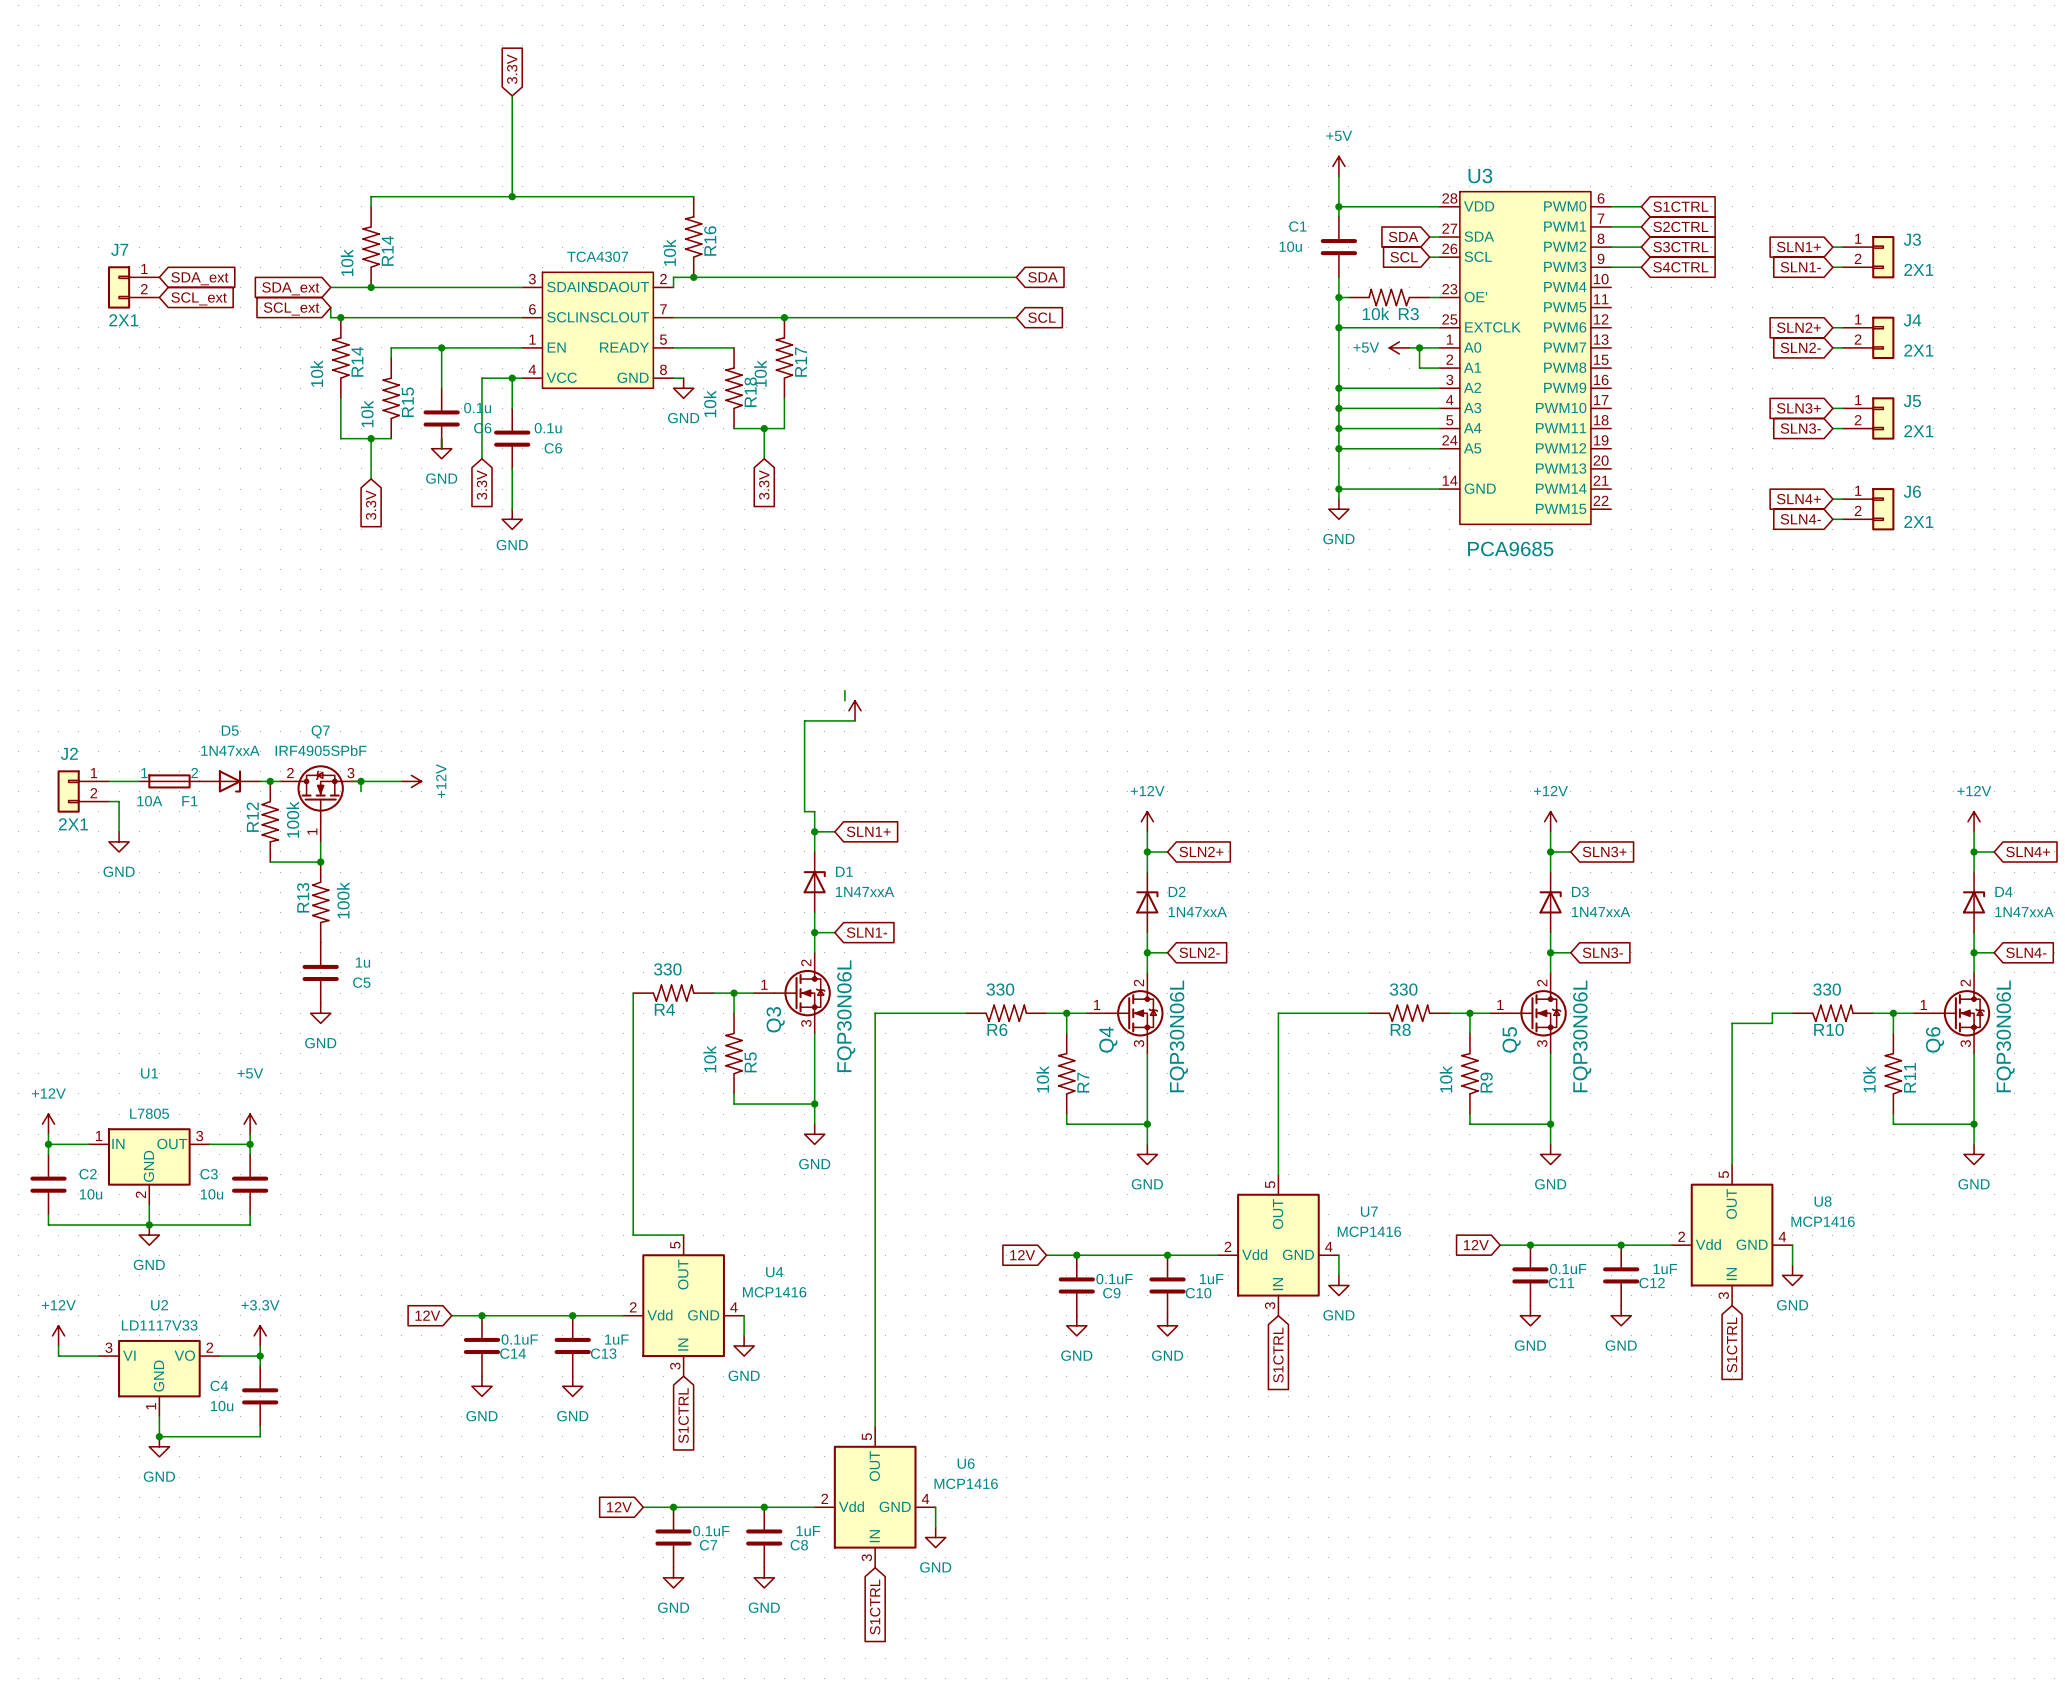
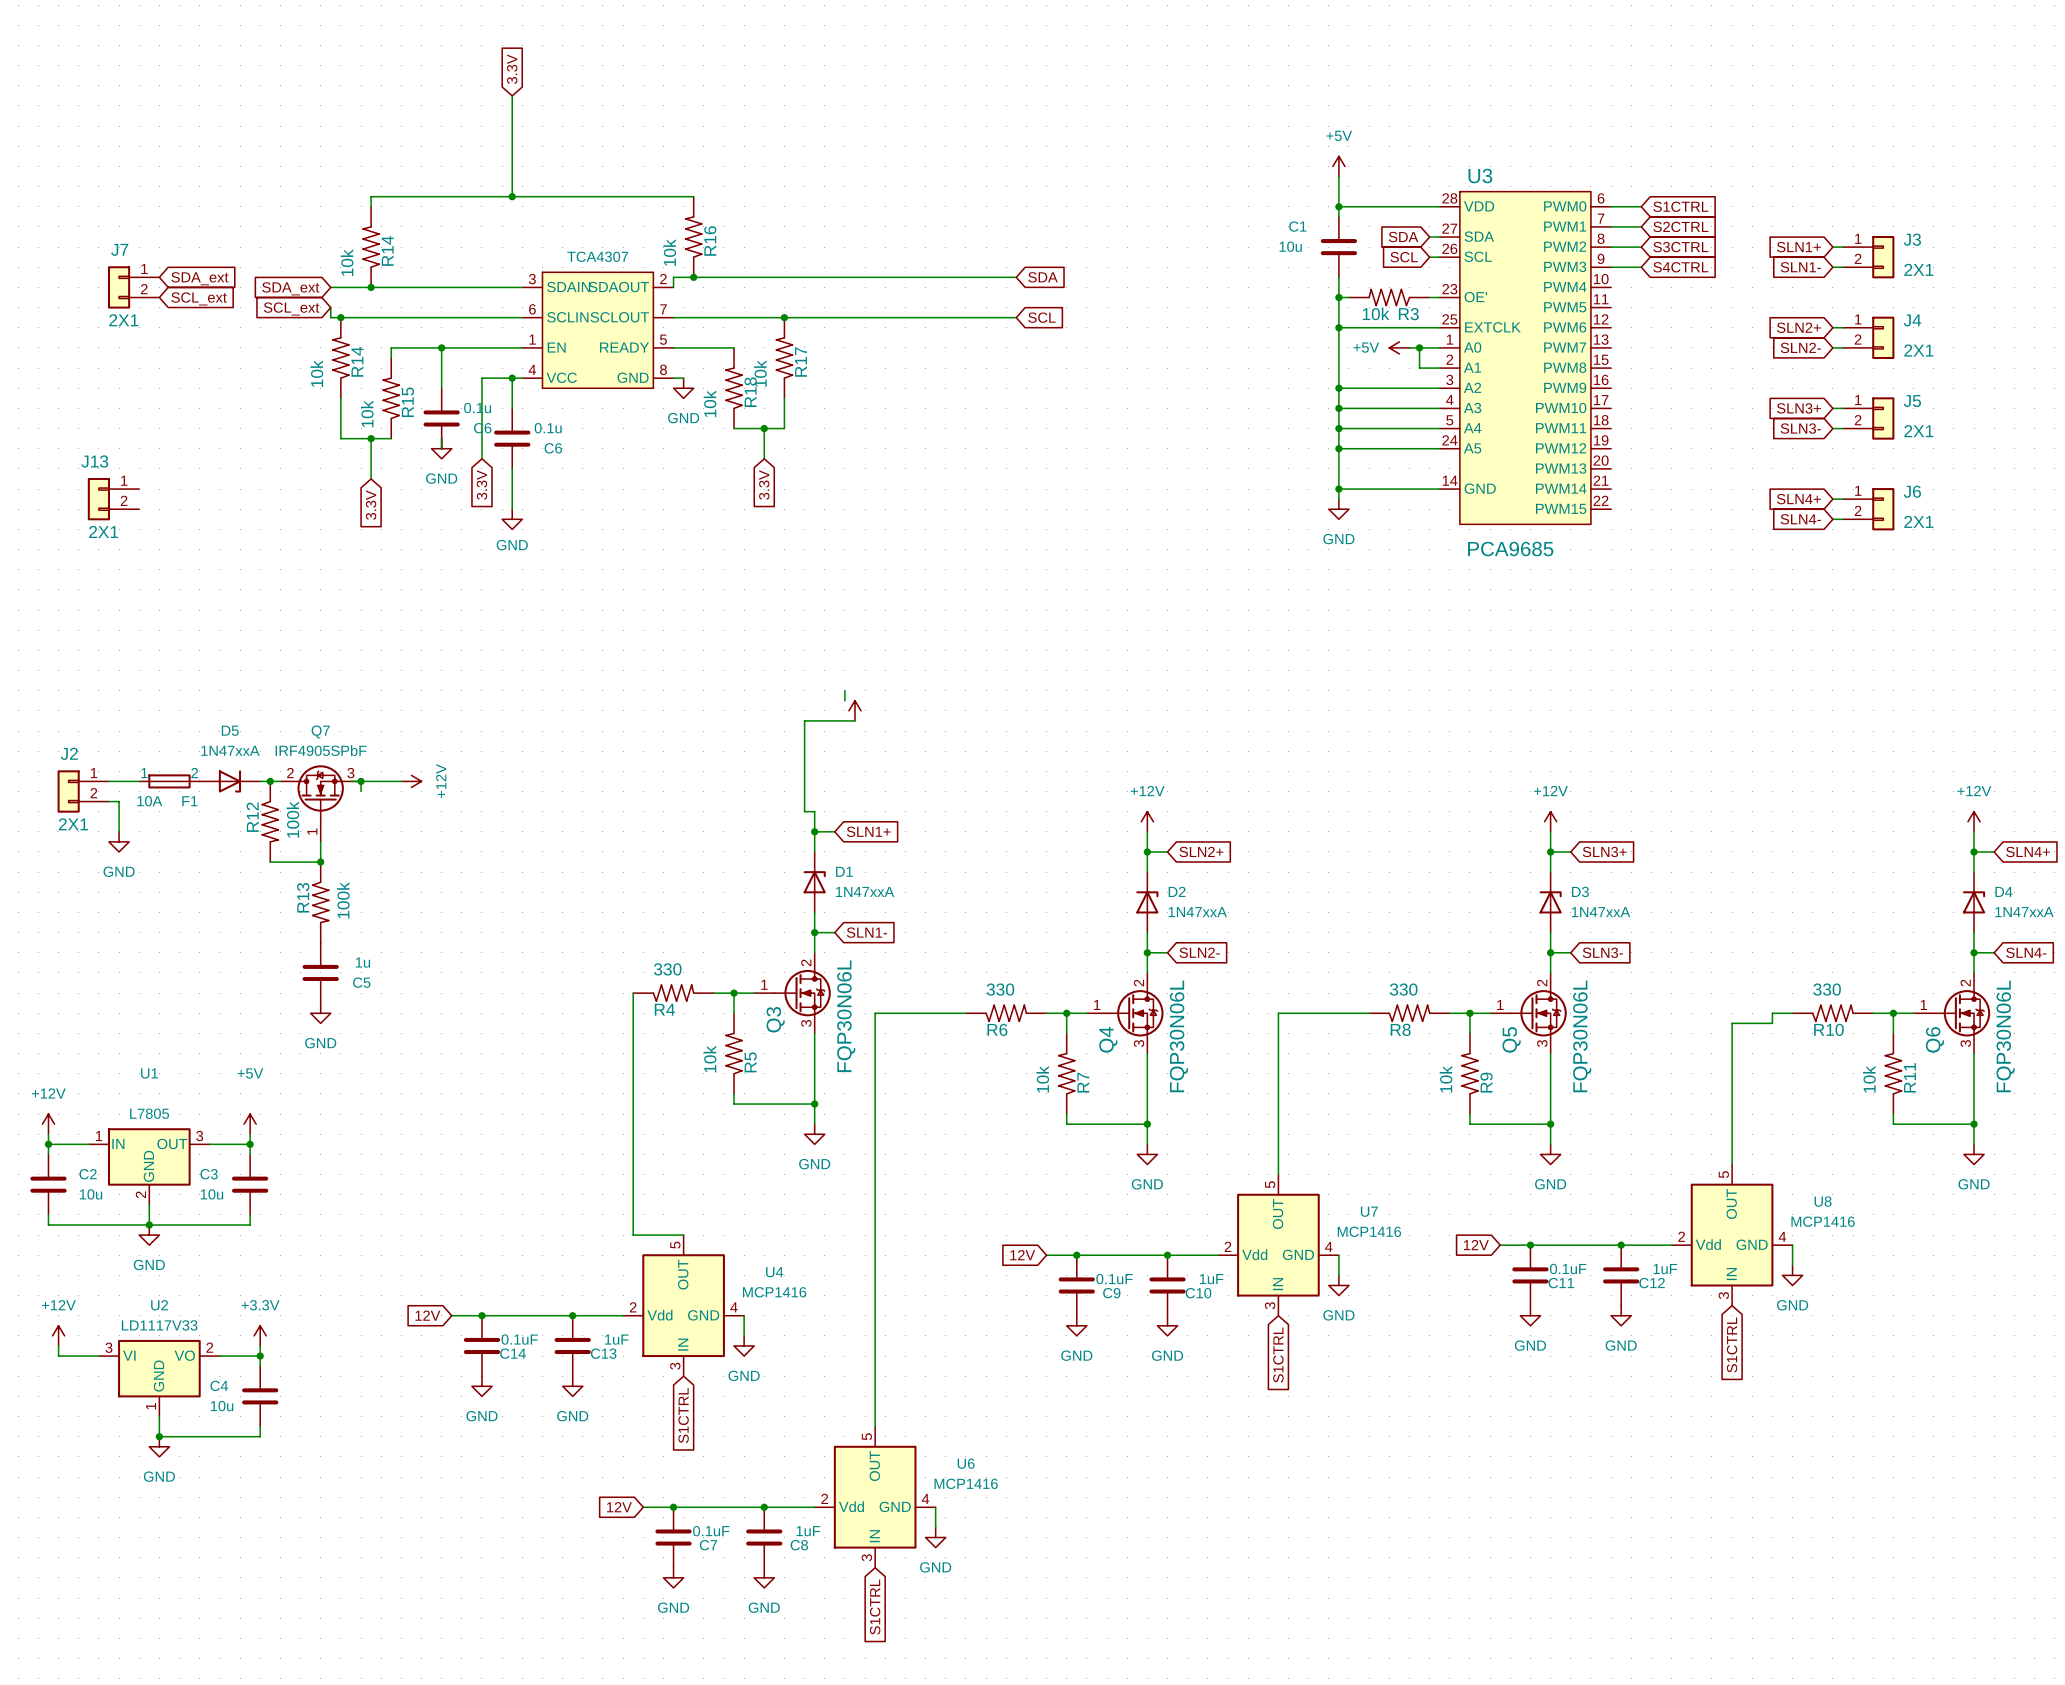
J13: none -> 2X1 (113, 499)

